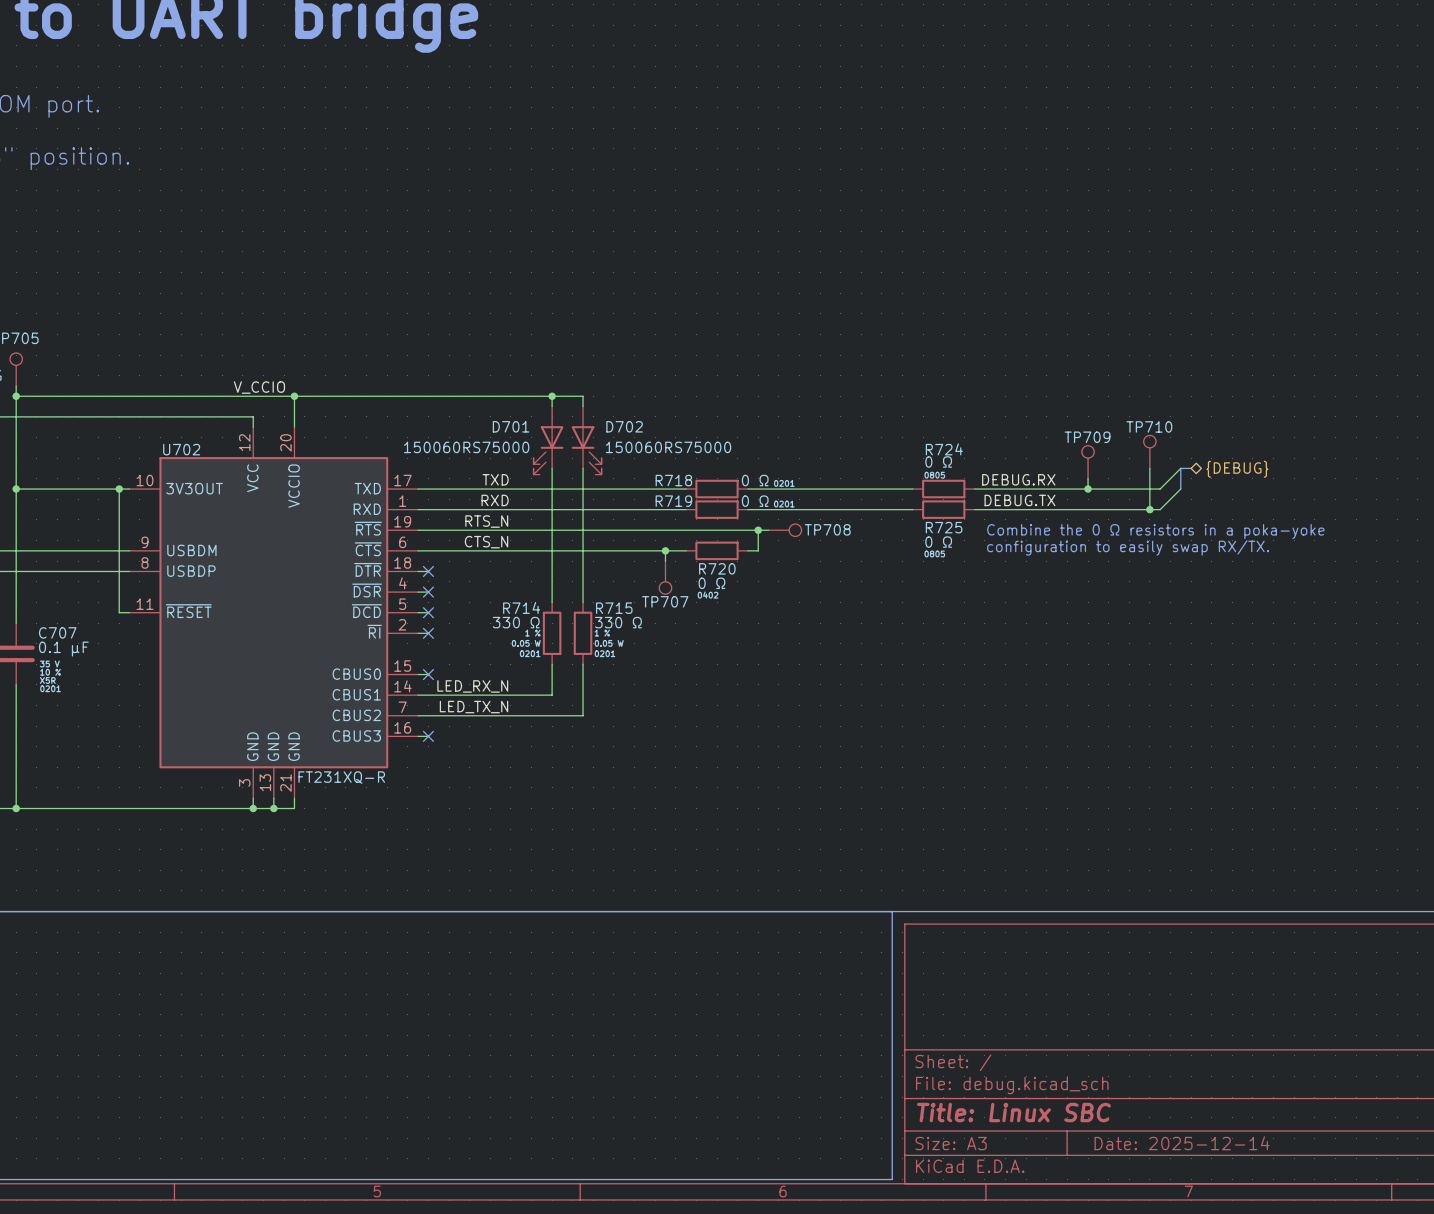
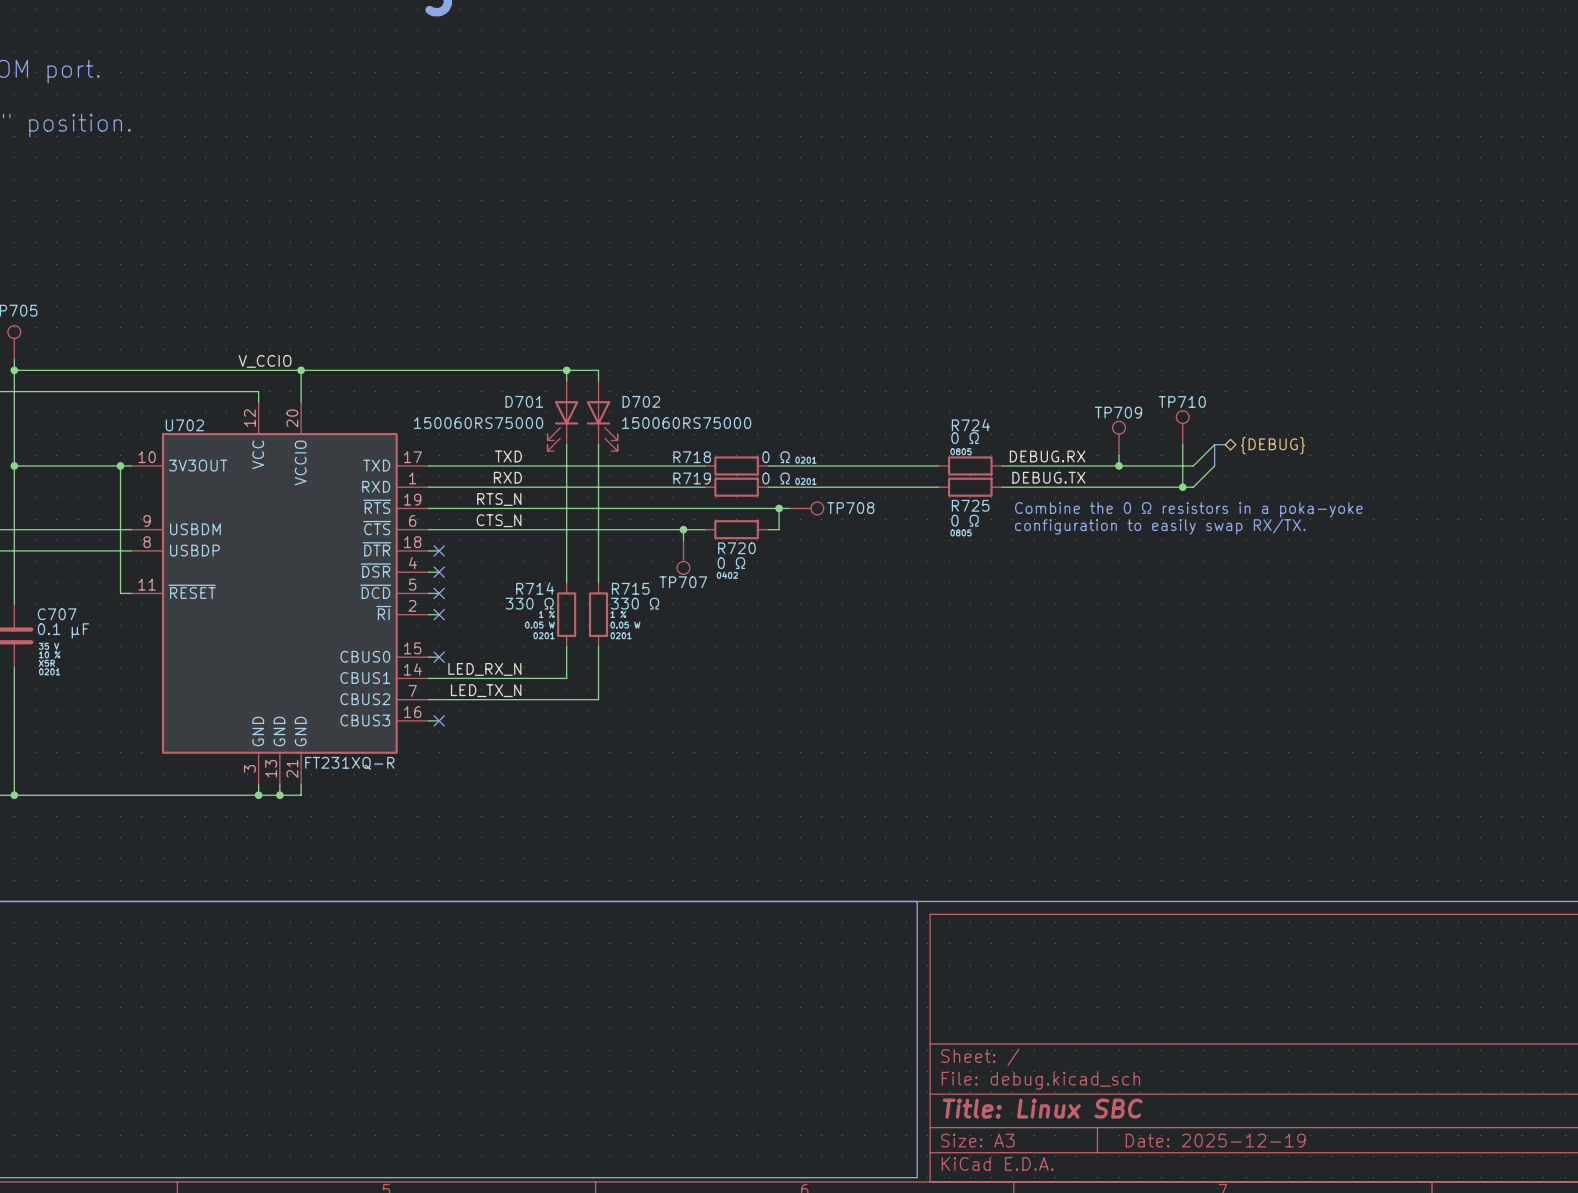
title block: Date: 2025-12-14 (1182, 1143) -> Date: 2025-12-19 (1215, 1140)

